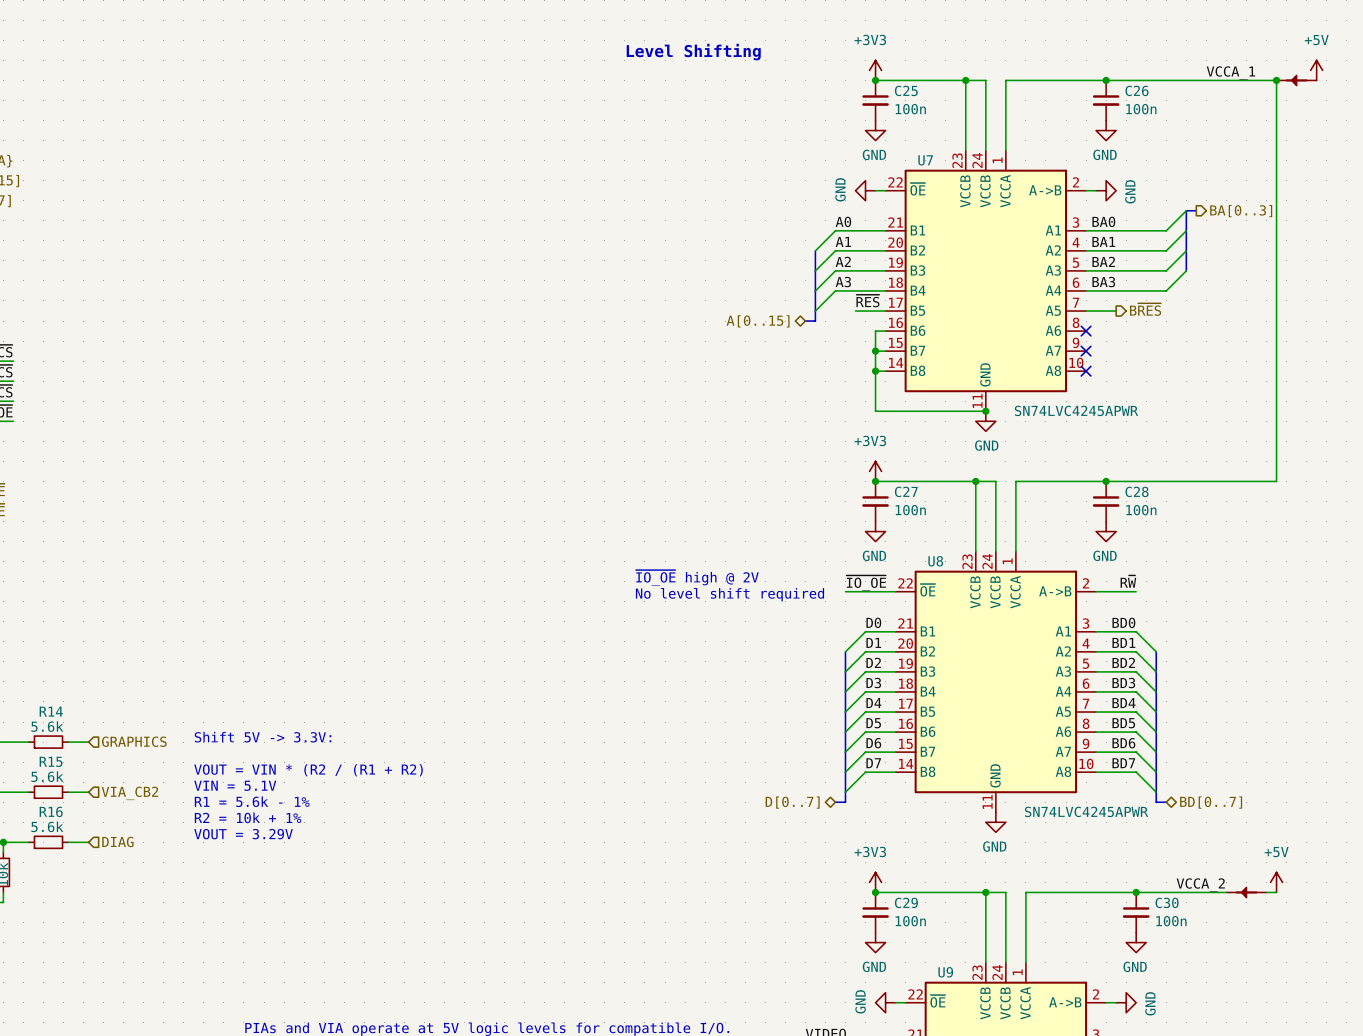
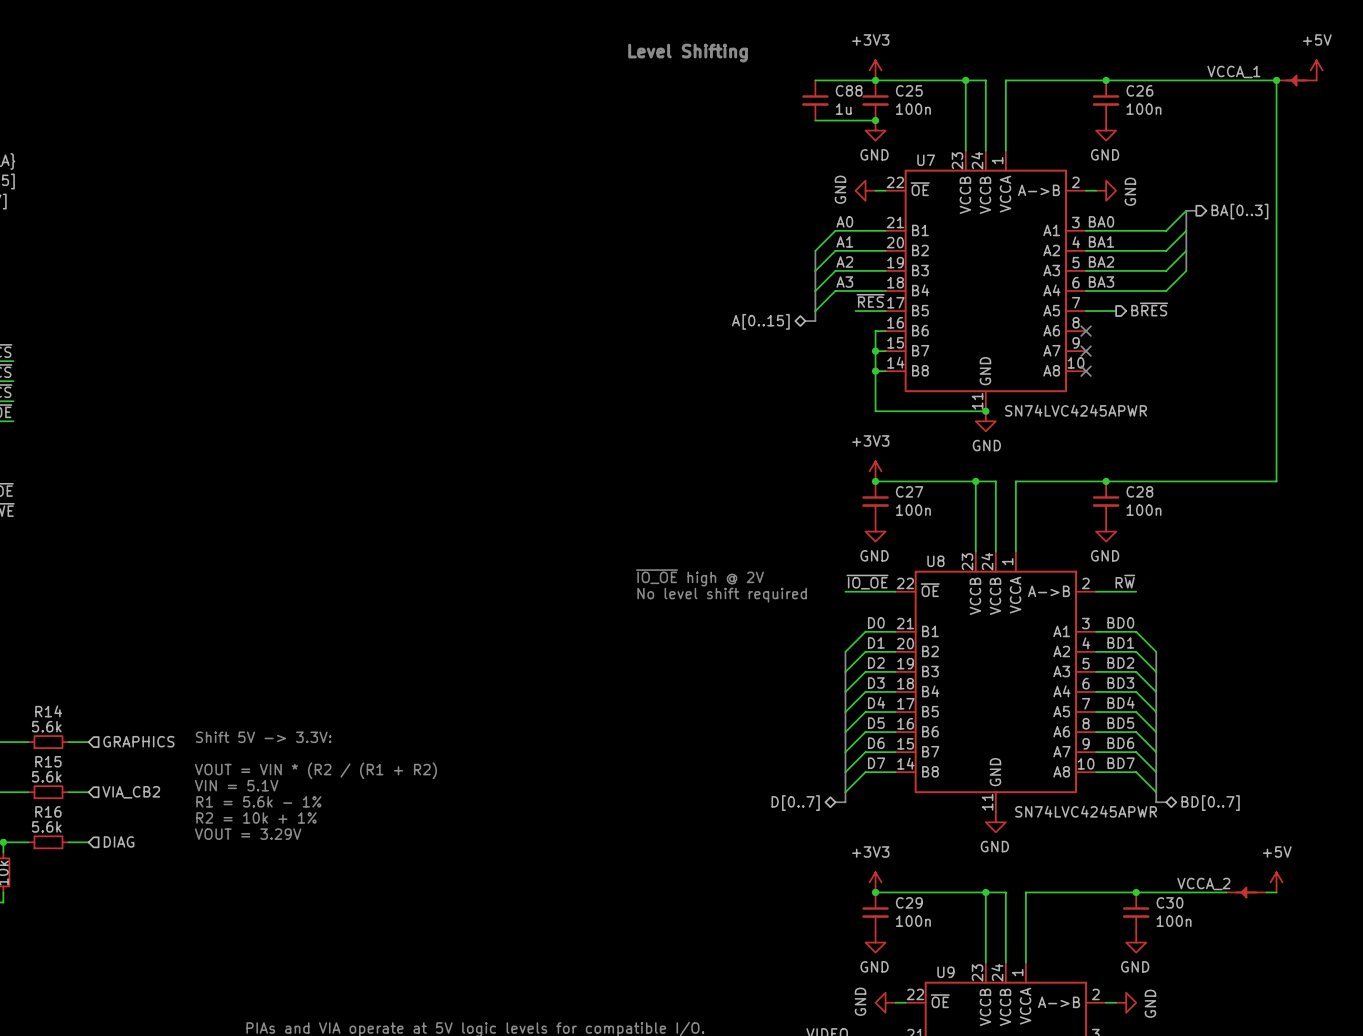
wire: none -> (815, 80) (875, 80)
C88: none -> 1u (815, 100)
wire: none -> (815, 120) (875, 120)
junction: none -> (875, 120)

